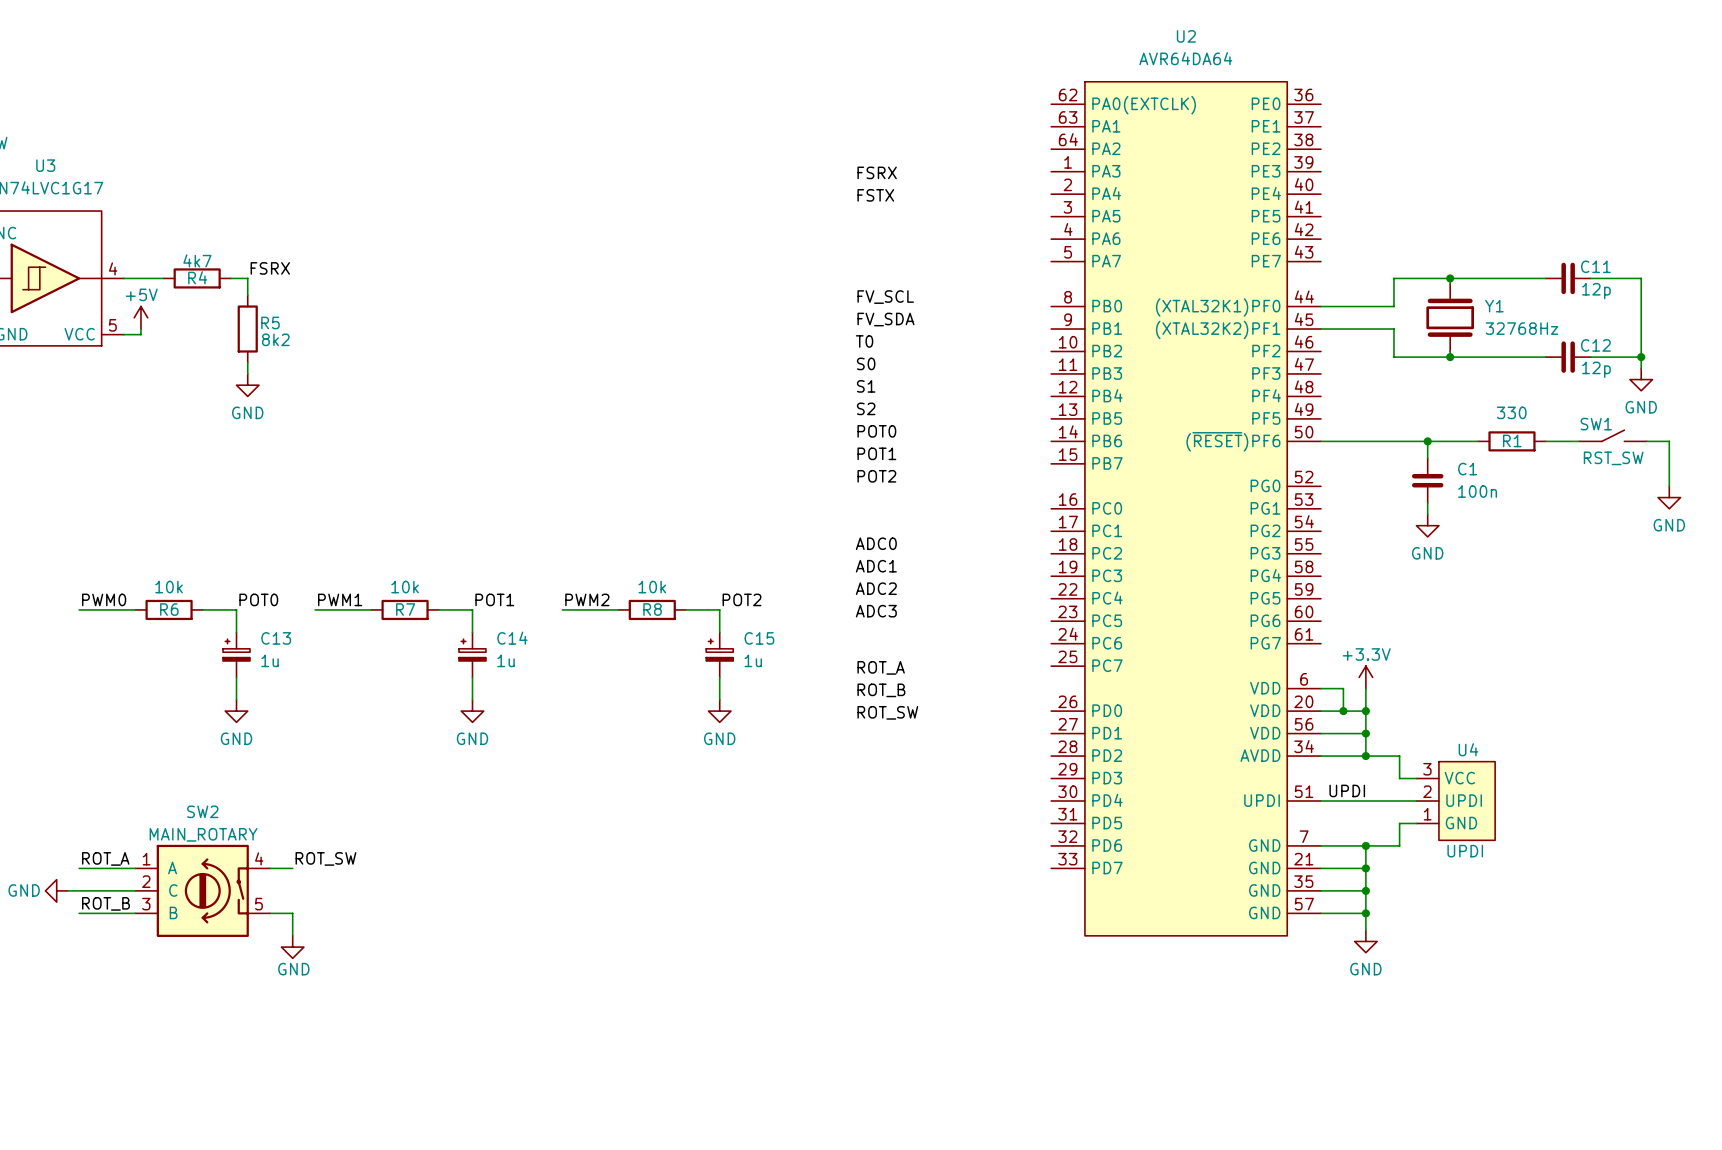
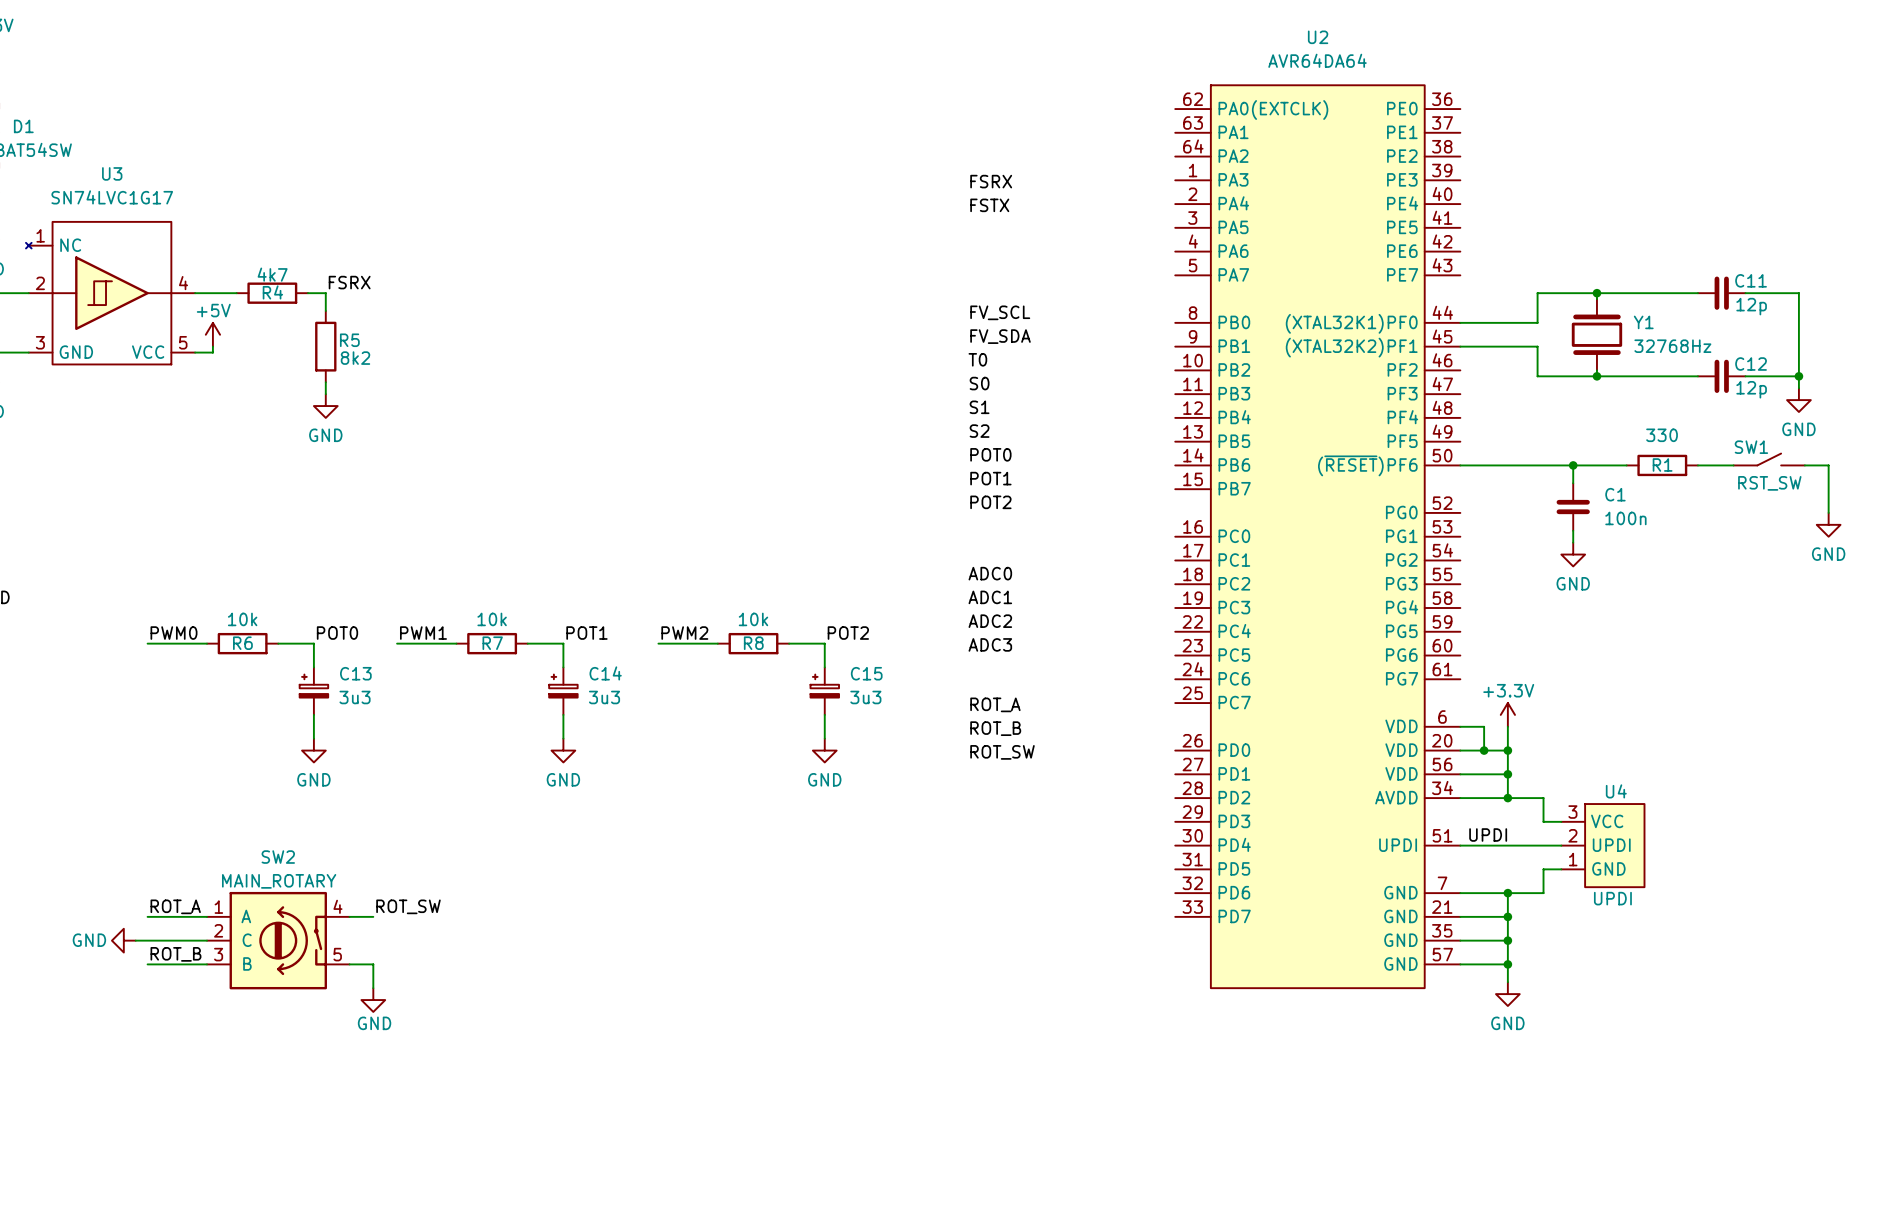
C13 value: 1u (270, 660) -> 3u3 (355, 697)
C14 value: 1u (506, 660) -> 3u3 (604, 697)
C15 value: 1u (753, 660) -> 3u3 (865, 697)

